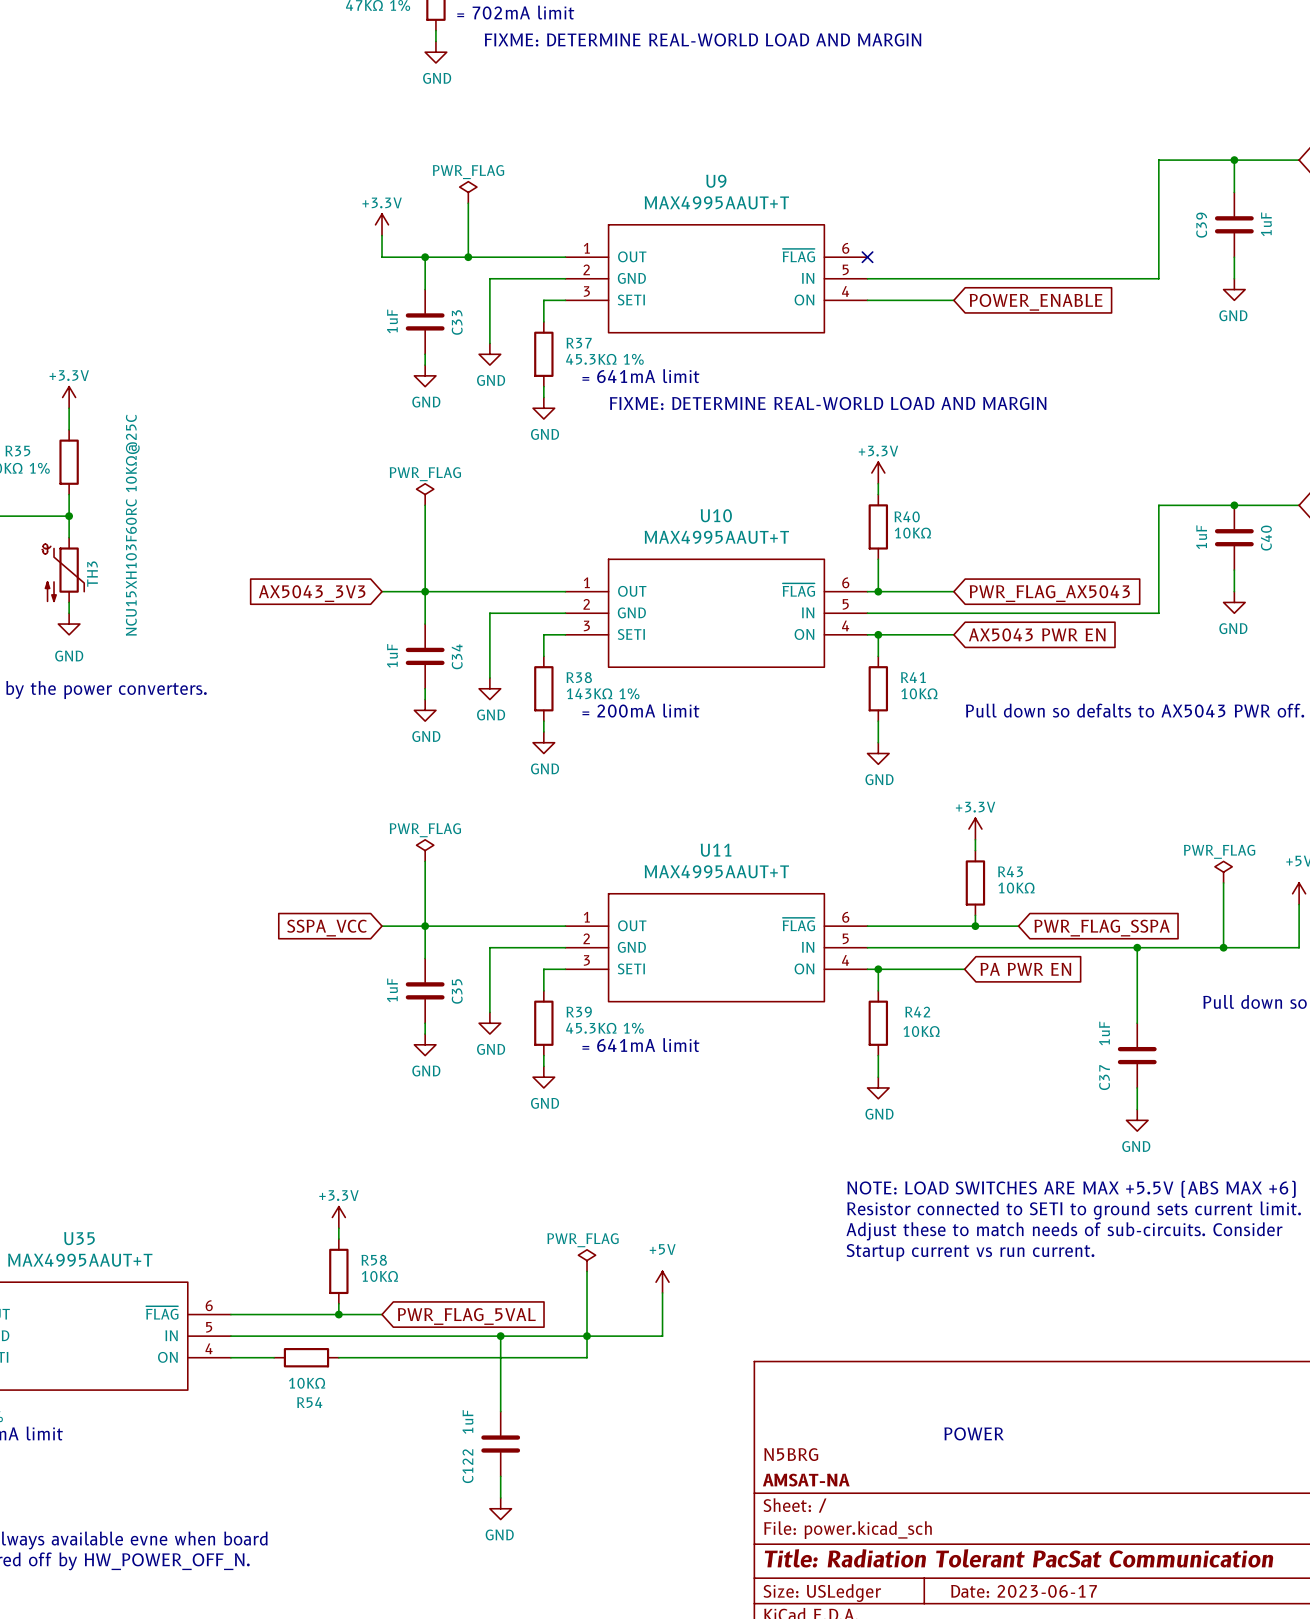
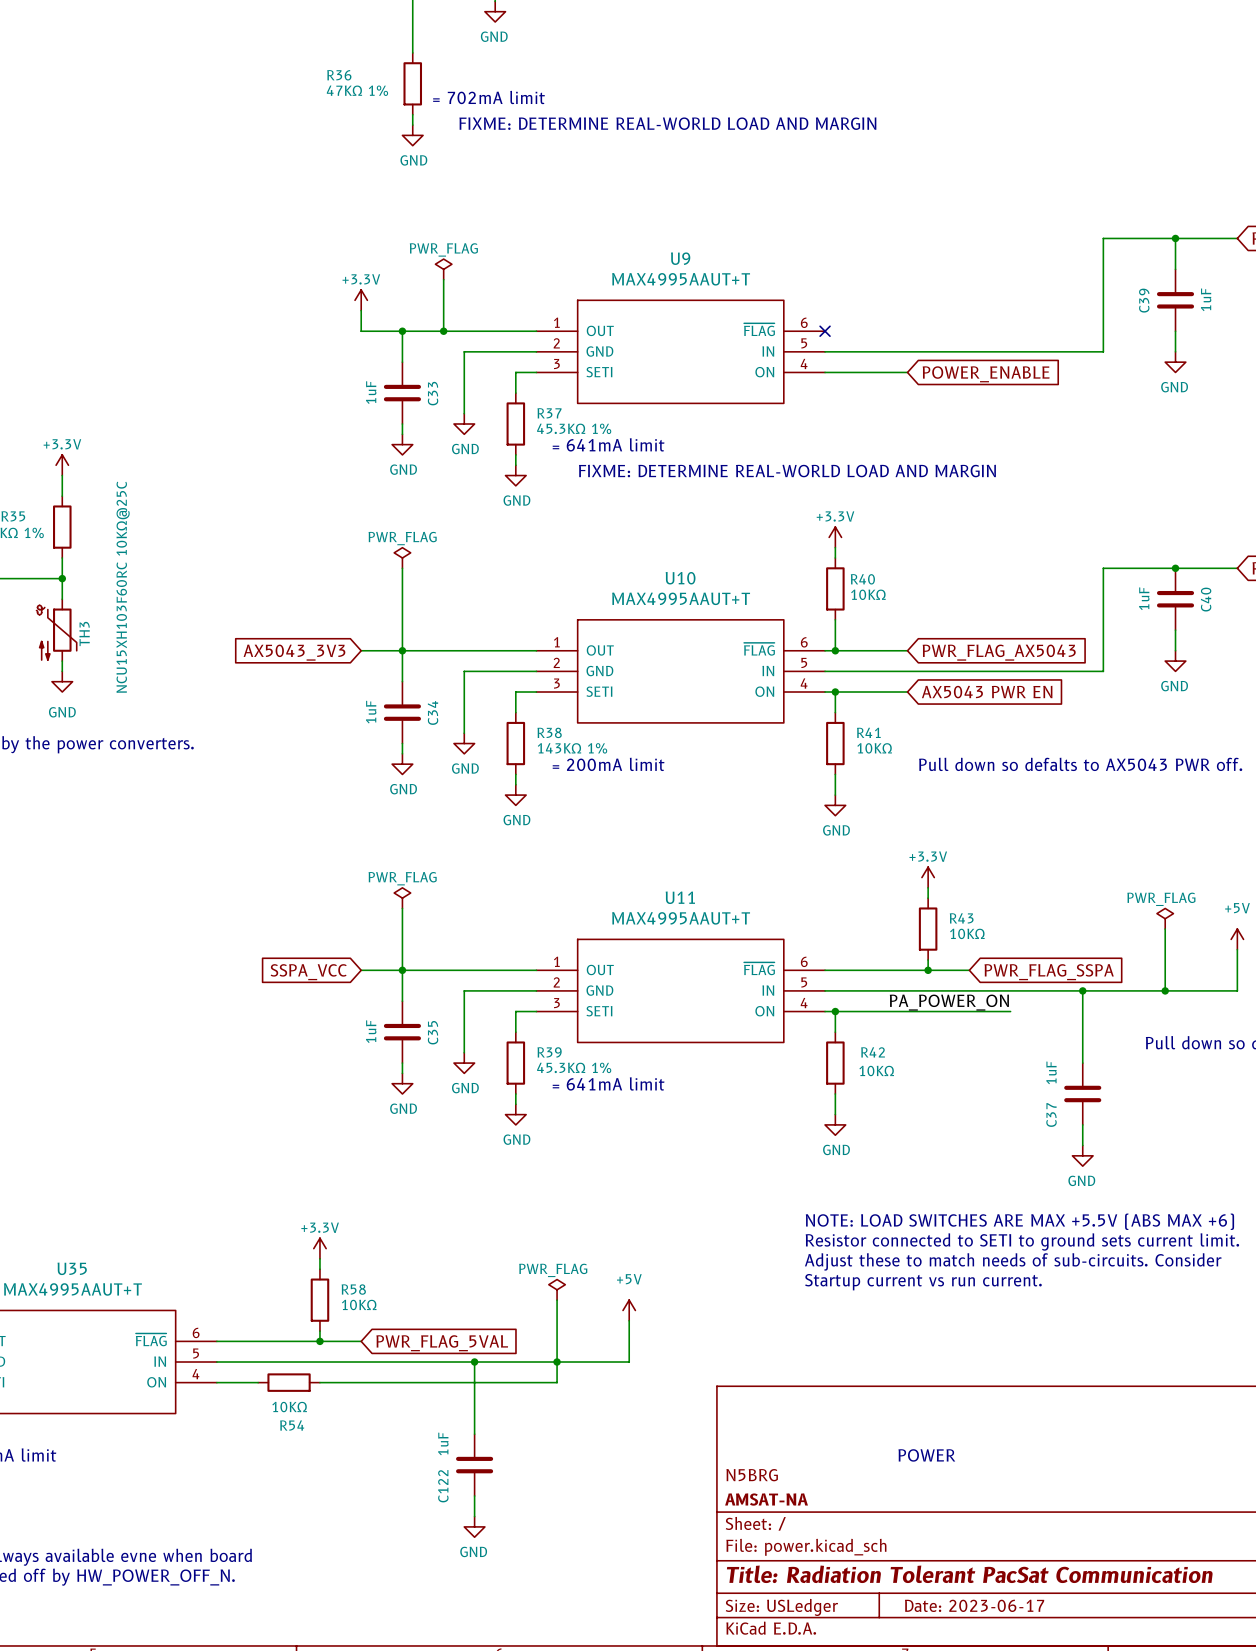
label: none -> PA_POWER_ON (949, 1002)
wire: none -> (917, 1011) (1010, 1011)
global label: PA PWR EN (1025, 969) -> none

